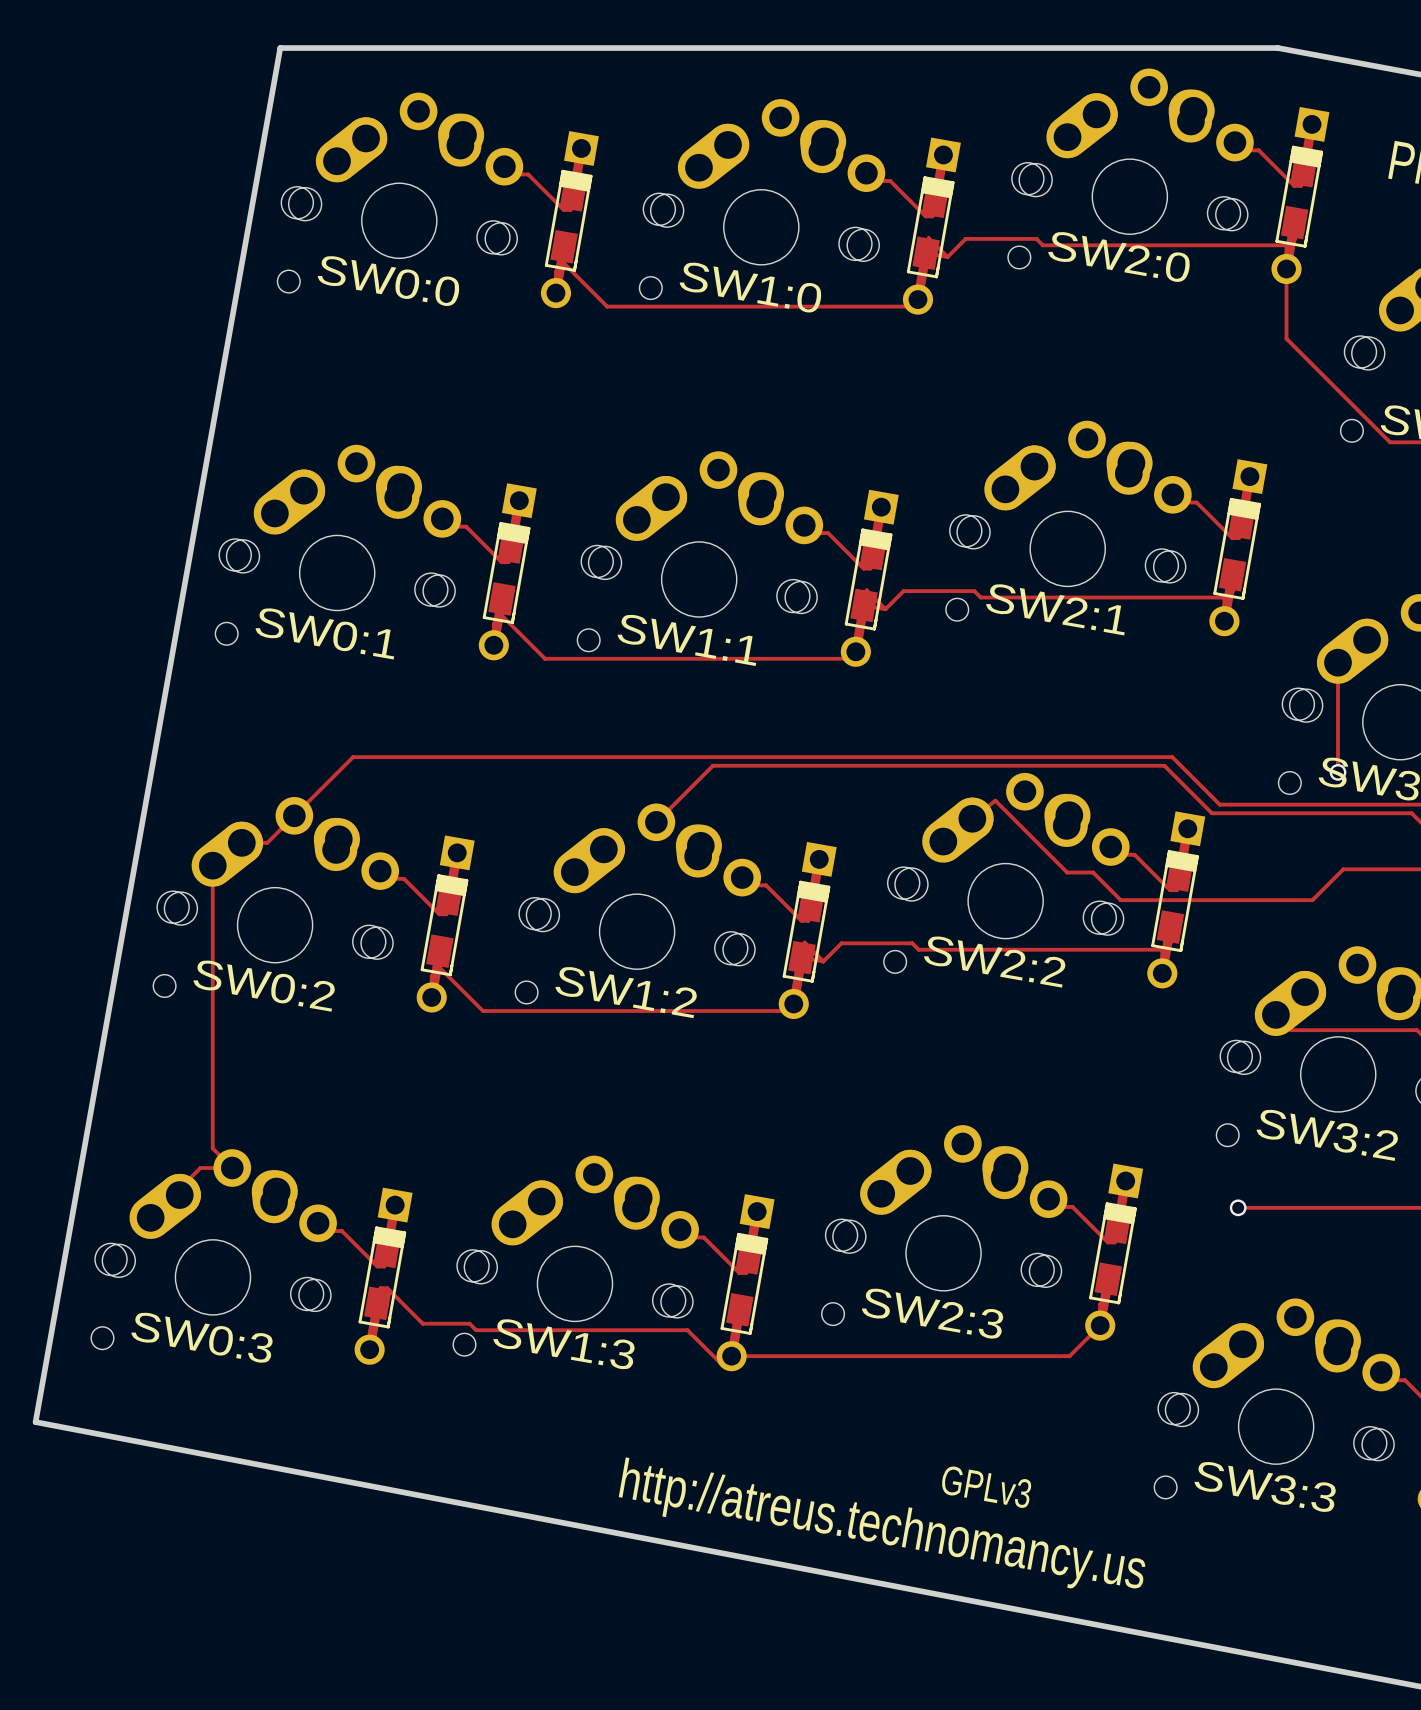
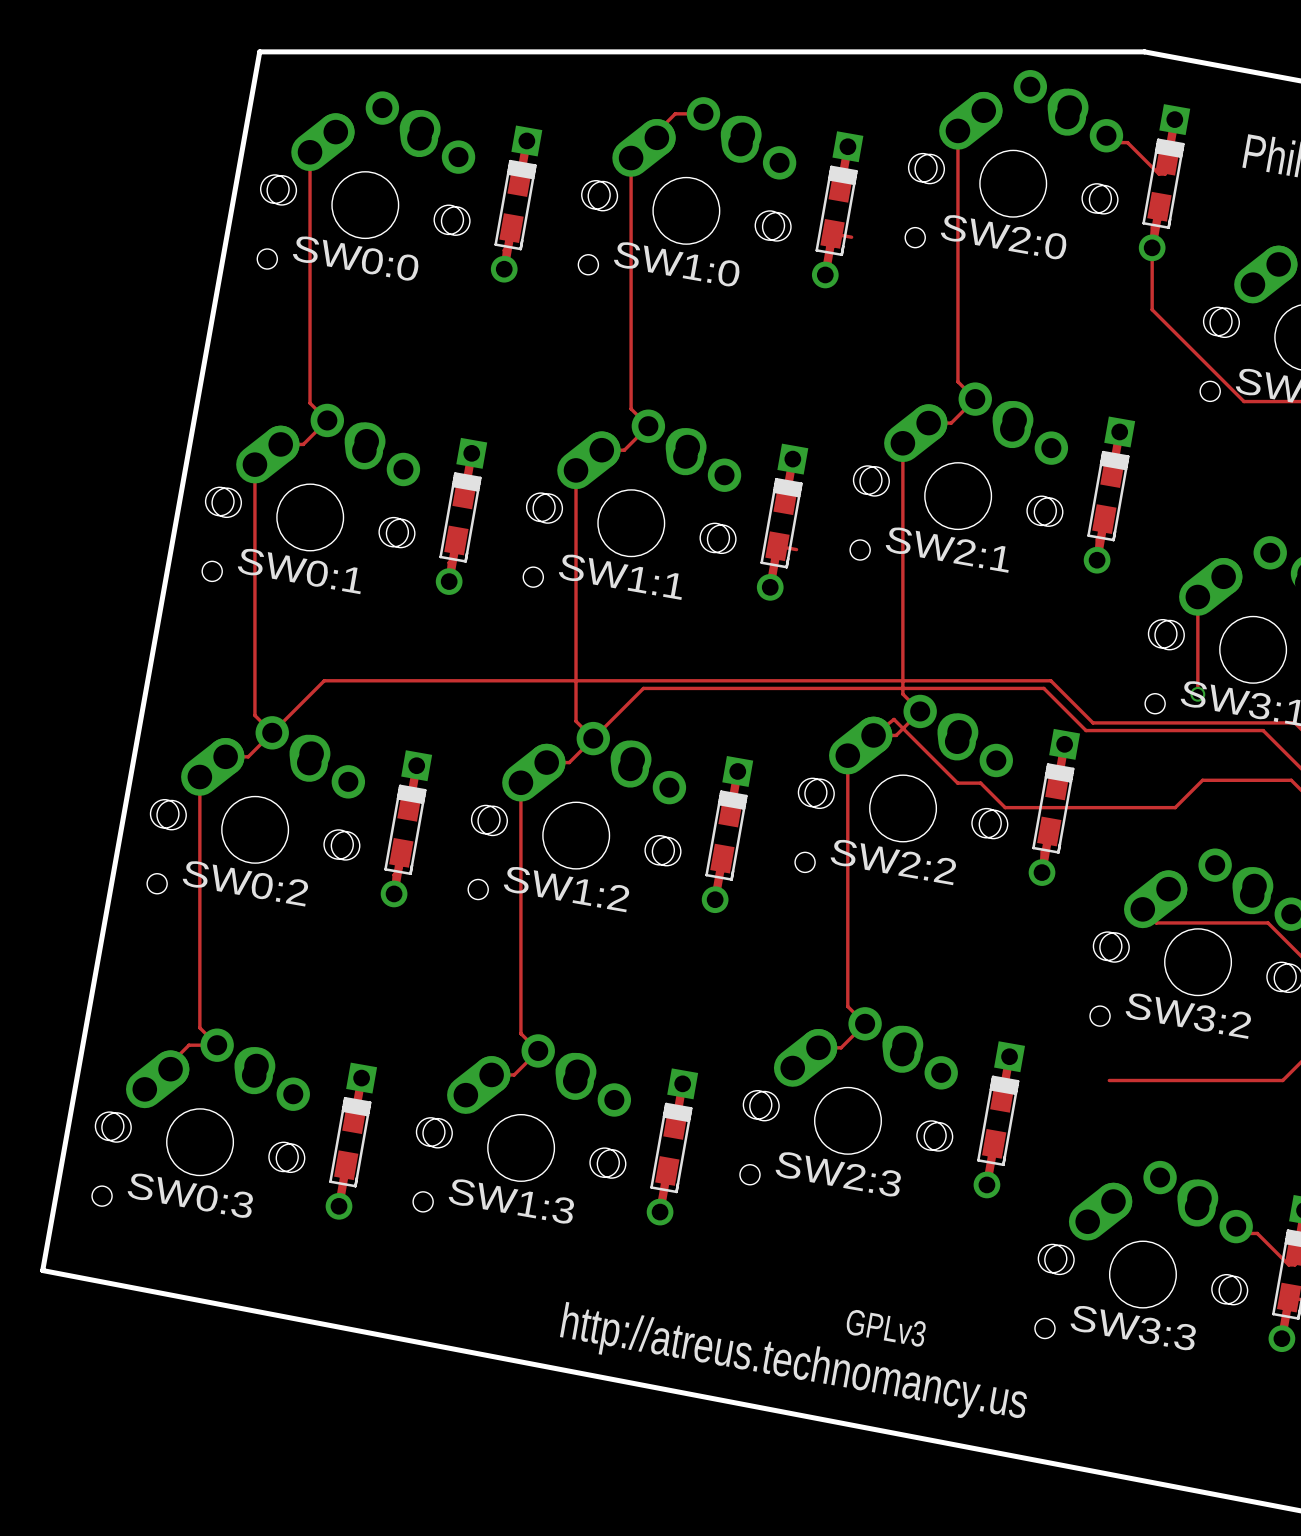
track: none -> (703, 113) (675, 113) (631, 158) (631, 408) (648, 426) (624, 450) (601, 450)
track: none -> (957, 130) (957, 381) (975, 399) (951, 423) (928, 423)
track: none -> (310, 152) (310, 403) (327, 420) (303, 444) (280, 444)
track: (504, 166) (512, 174) (528, 174) (563, 209) (570, 209) (576, 174) (573, 178) (573, 194) -> none
track: (866, 173) (874, 180) (890, 180) (925, 216) (932, 216) (938, 180) -> none
track: (1294, 222) (1294, 239) (1288, 245) (1042, 245) (1036, 238) (965, 238) (947, 257) (928, 238) (922, 273) (922, 294) (910, 306) (607, 306) (564, 263) (564, 246) -> none
track: none -> (902, 443) (902, 694) (920, 711) (896, 735) (873, 735)
track: (1172, 494) (1180, 502) (1196, 502) (1232, 538) (1239, 538) (1245, 502) -> none
track: none -> (254, 464) (254, 715) (272, 732)
track: (442, 518) (450, 526) (466, 526) (501, 562) (508, 562) (514, 526) (511, 530) (511, 547) -> none
track: none -> (576, 470) (576, 721) (593, 738) (569, 762) (546, 762)
track: (804, 525) (812, 533) (828, 533) (863, 568) (870, 568) (876, 533) -> none
track: (1232, 574) (1232, 591) (1226, 597) (980, 597) (974, 591) (903, 591) (885, 609) (866, 590) (860, 625) (860, 647) (848, 658) (545, 658) (502, 615) (502, 598) -> none
track: none -> (847, 755) (847, 1006) (865, 1023) (841, 1047) (818, 1047)
track: (1110, 846) (1118, 854) (1134, 854) (1170, 890) (1176, 890) (1183, 854) -> none
track: (380, 871) (387, 878) (404, 878) (439, 914) (446, 914) (452, 878) -> none
track: none -> (520, 782) (520, 1033) (538, 1050) (514, 1074) (491, 1074)
track: (742, 877) (749, 885) (766, 885) (801, 920) (808, 920) (814, 885) -> none
track: (1170, 927) (1170, 943) (1164, 949) (918, 949) (912, 943) (841, 943) (823, 961) (801, 957) -> none
track: (439, 951) (439, 967) (482, 1011) (786, 1011) (798, 999) (798, 978) (804, 942) (823, 961) -> none
track: (1048, 1199) (1056, 1206) (1072, 1206) (1107, 1242) (1114, 1242) (1121, 1206) -> none
via: (1238, 1207) -> none
track: (318, 1223) (325, 1231) (341, 1231) (377, 1266) (384, 1266) (390, 1231) -> none
track: (680, 1229) (687, 1237) (703, 1237) (739, 1272) (746, 1272) (752, 1237) -> none
track: (1108, 1279) (1108, 1296) (1100, 1304) (1100, 1325) (1069, 1356) (731, 1356) (729, 1365) -> none
track: (369, 1349) (374, 1345) (374, 1323) (380, 1288) (387, 1288) (422, 1323) (469, 1323) (476, 1330) (687, 1330) (723, 1365) (729, 1365) -> none

